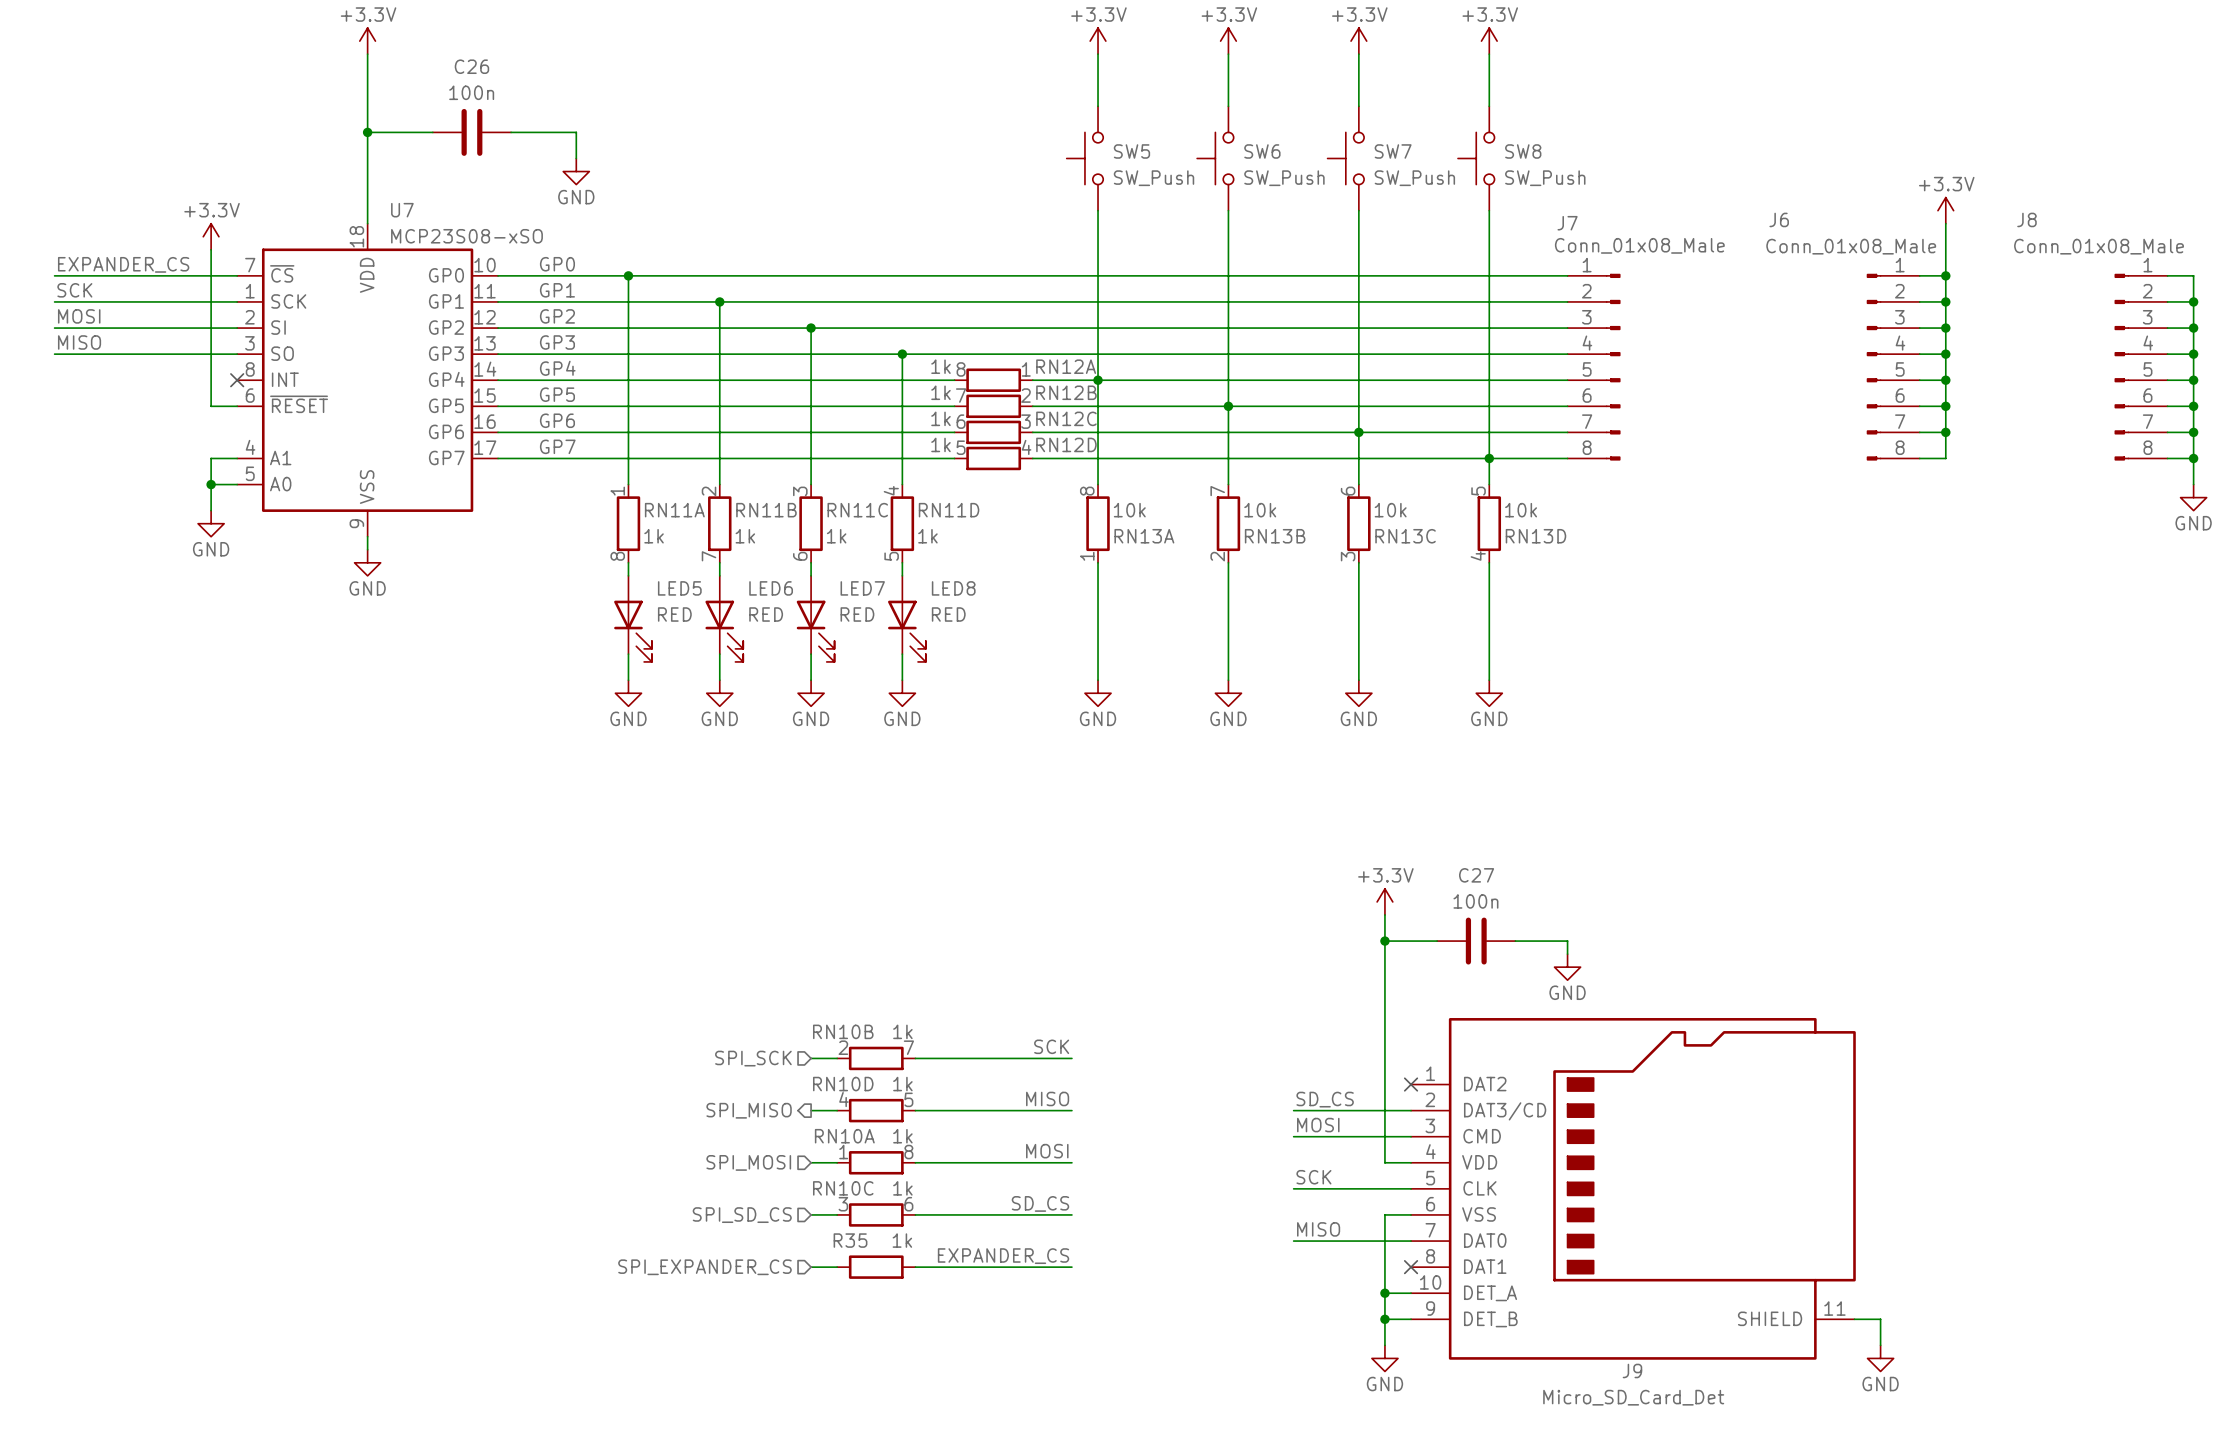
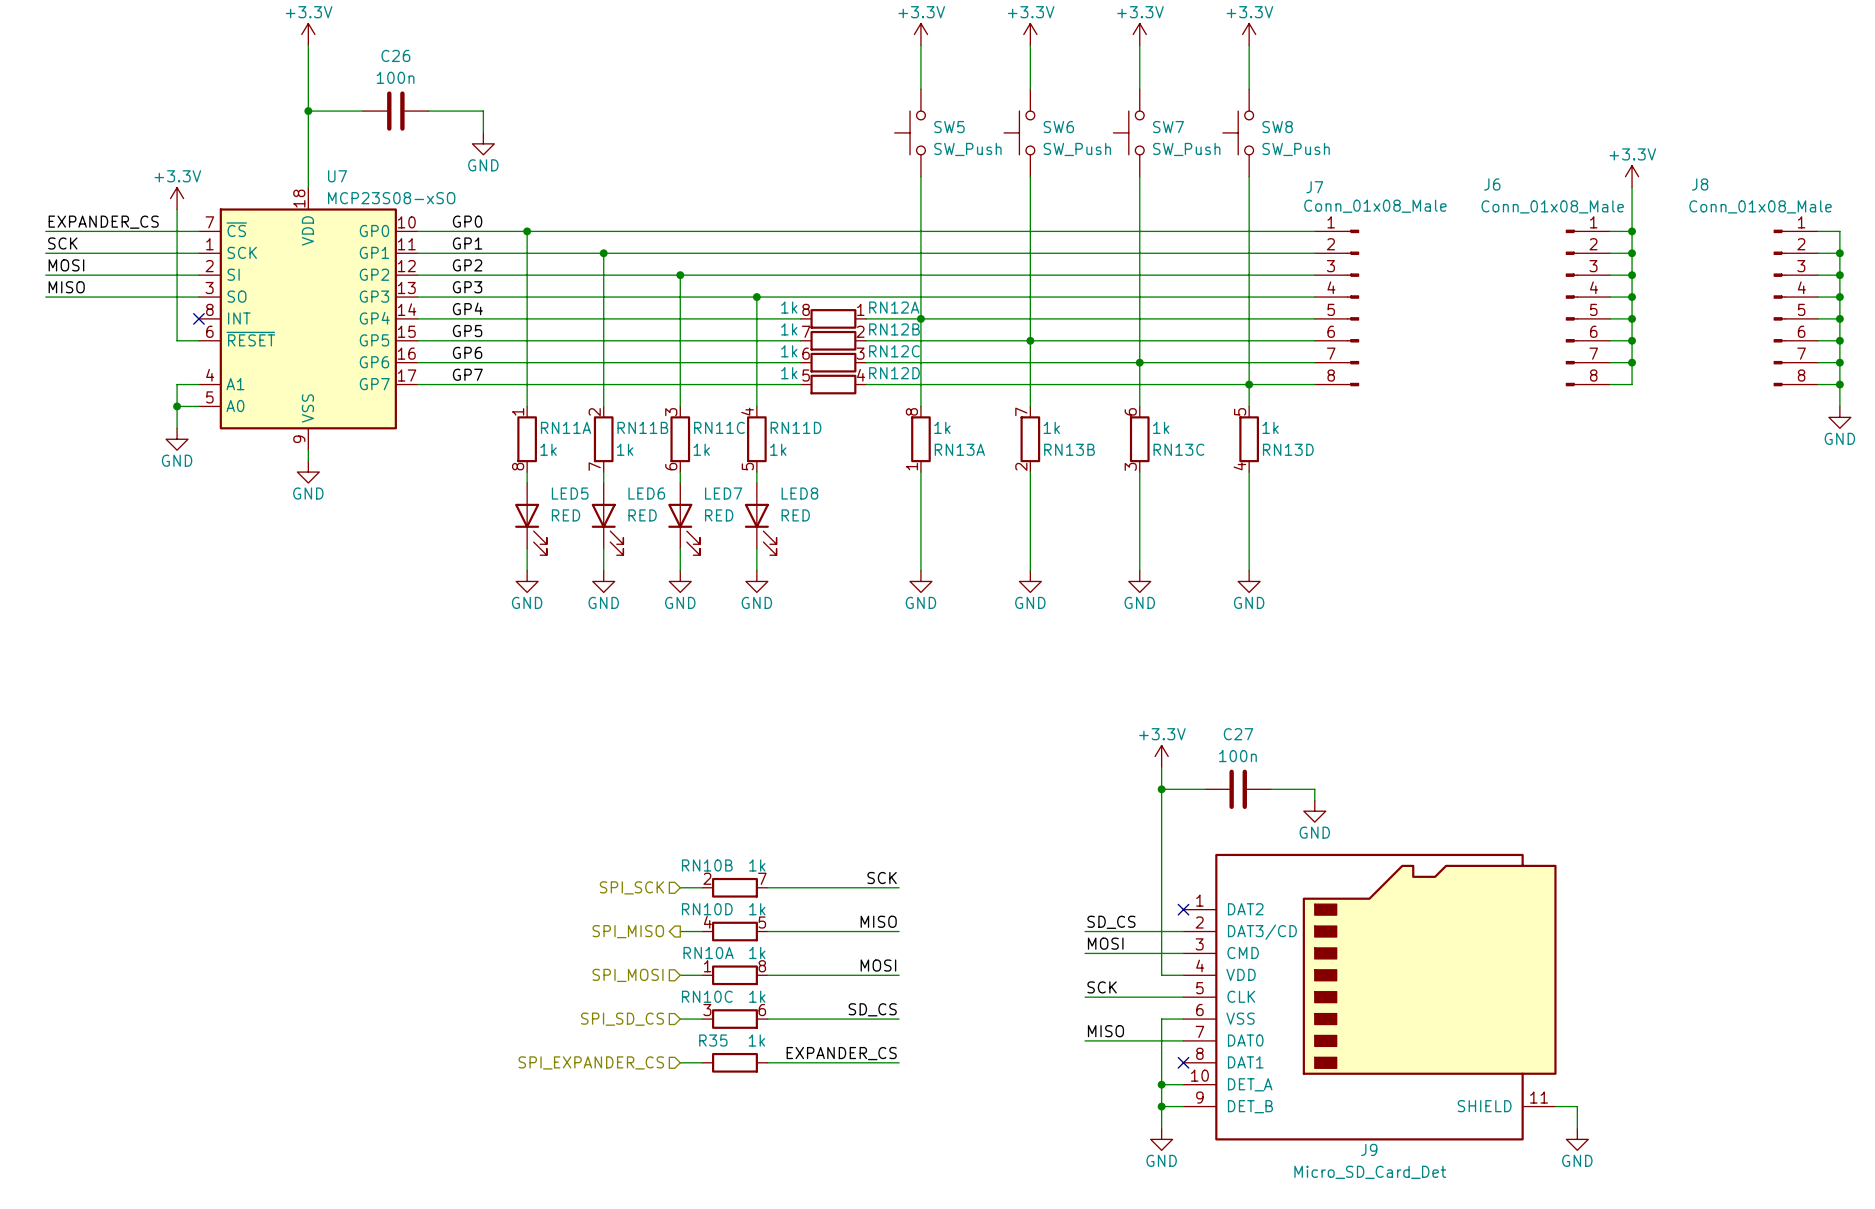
RN13A value: 10k (1129, 510) -> 1k (942, 427)
RN13B value: 10k (1260, 510) -> 1k (1051, 427)
RN13C value: 10k (1390, 510) -> 1k (1161, 427)
RN13D value: 10k (1521, 510) -> 1k (1270, 427)

